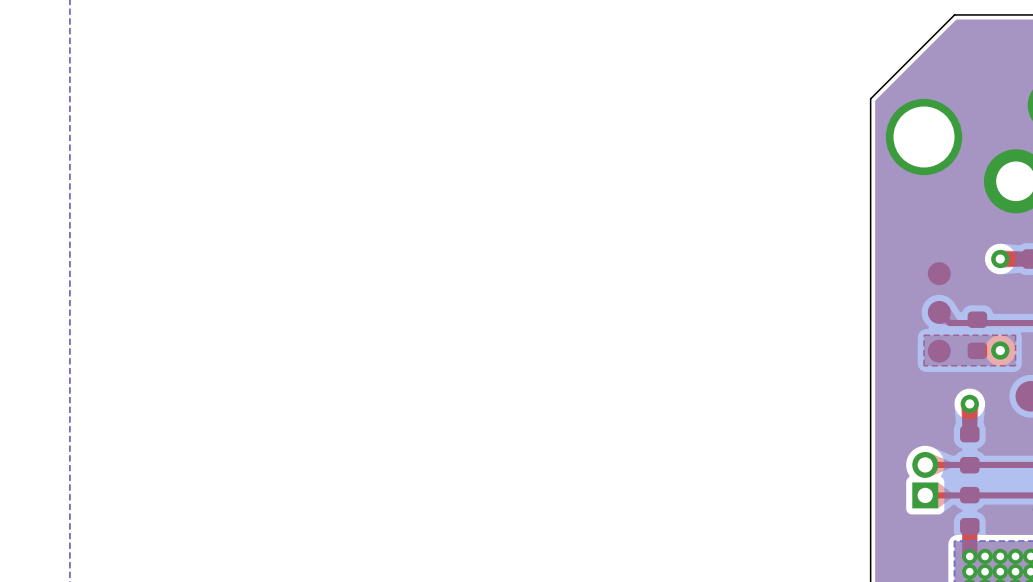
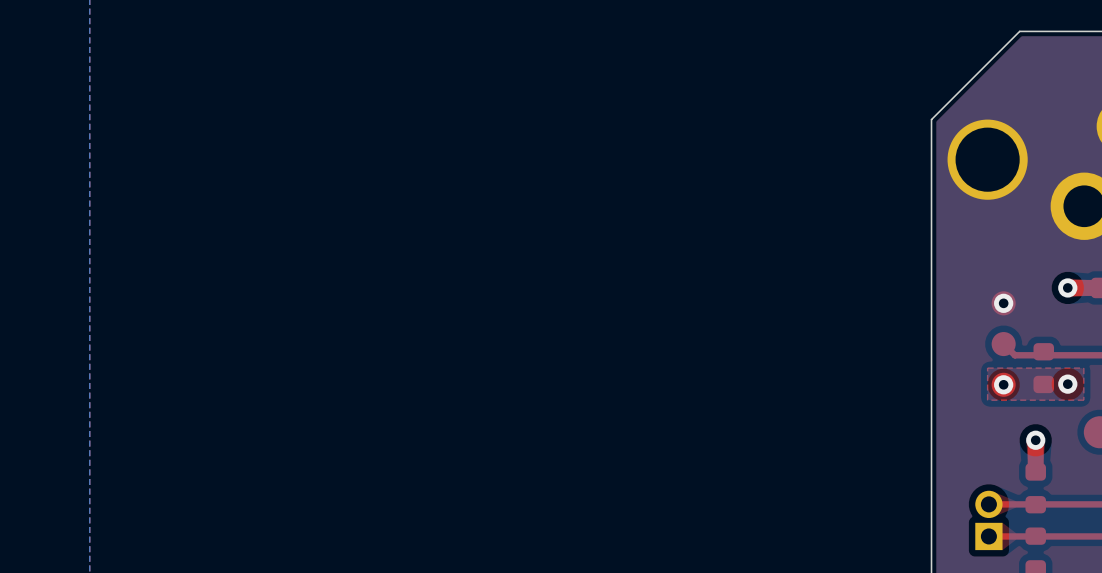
via: none -> (1003, 303)
via: none -> (1003, 384)

